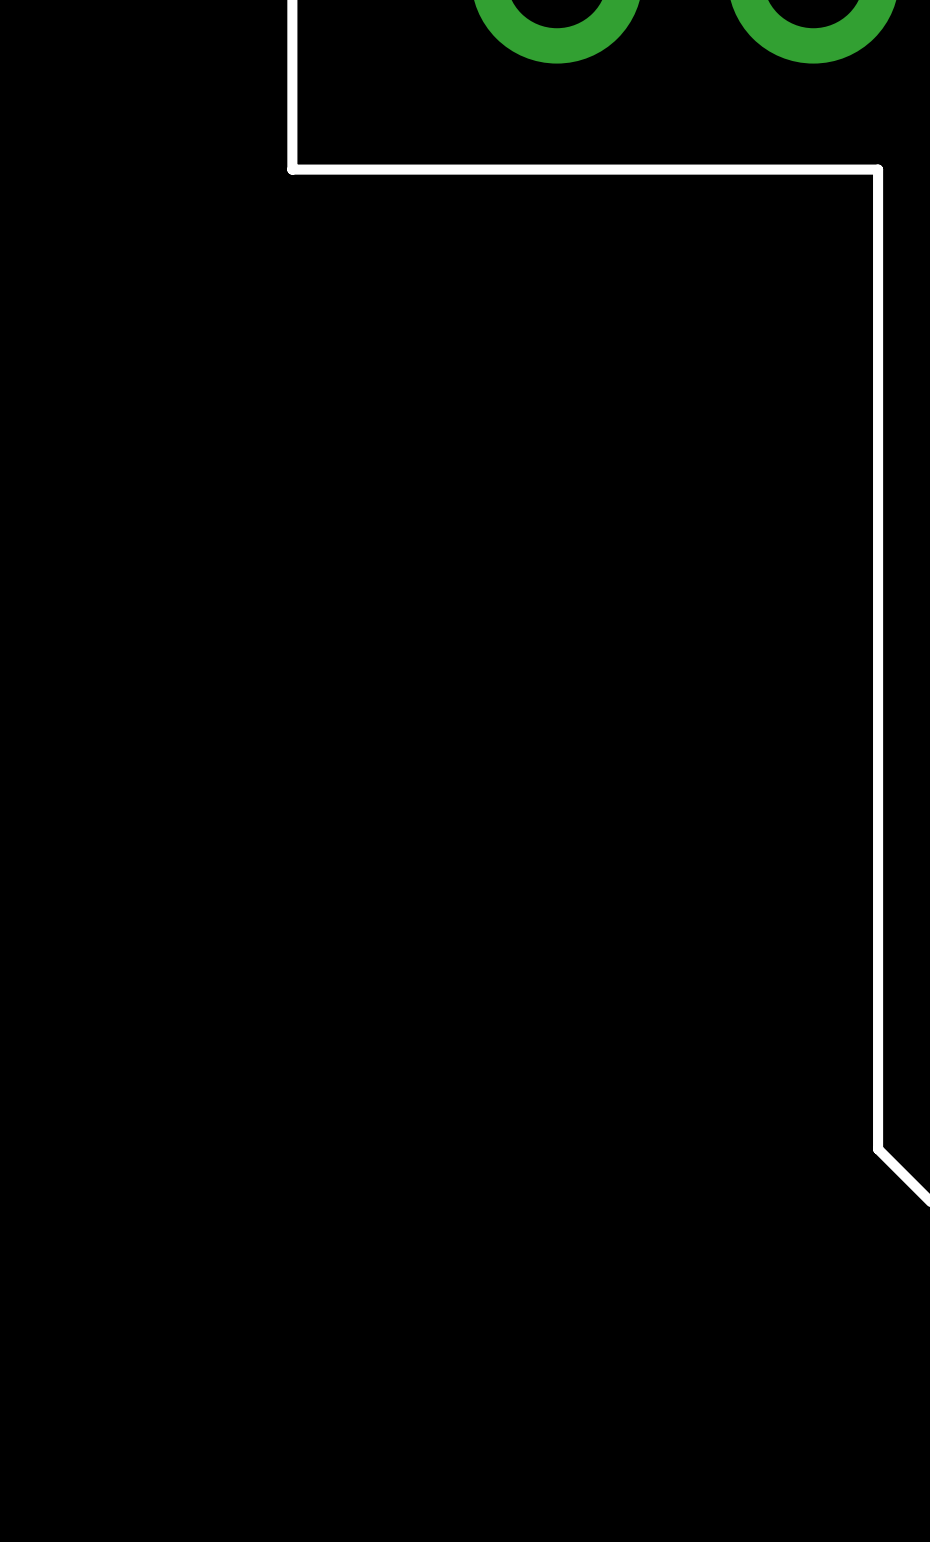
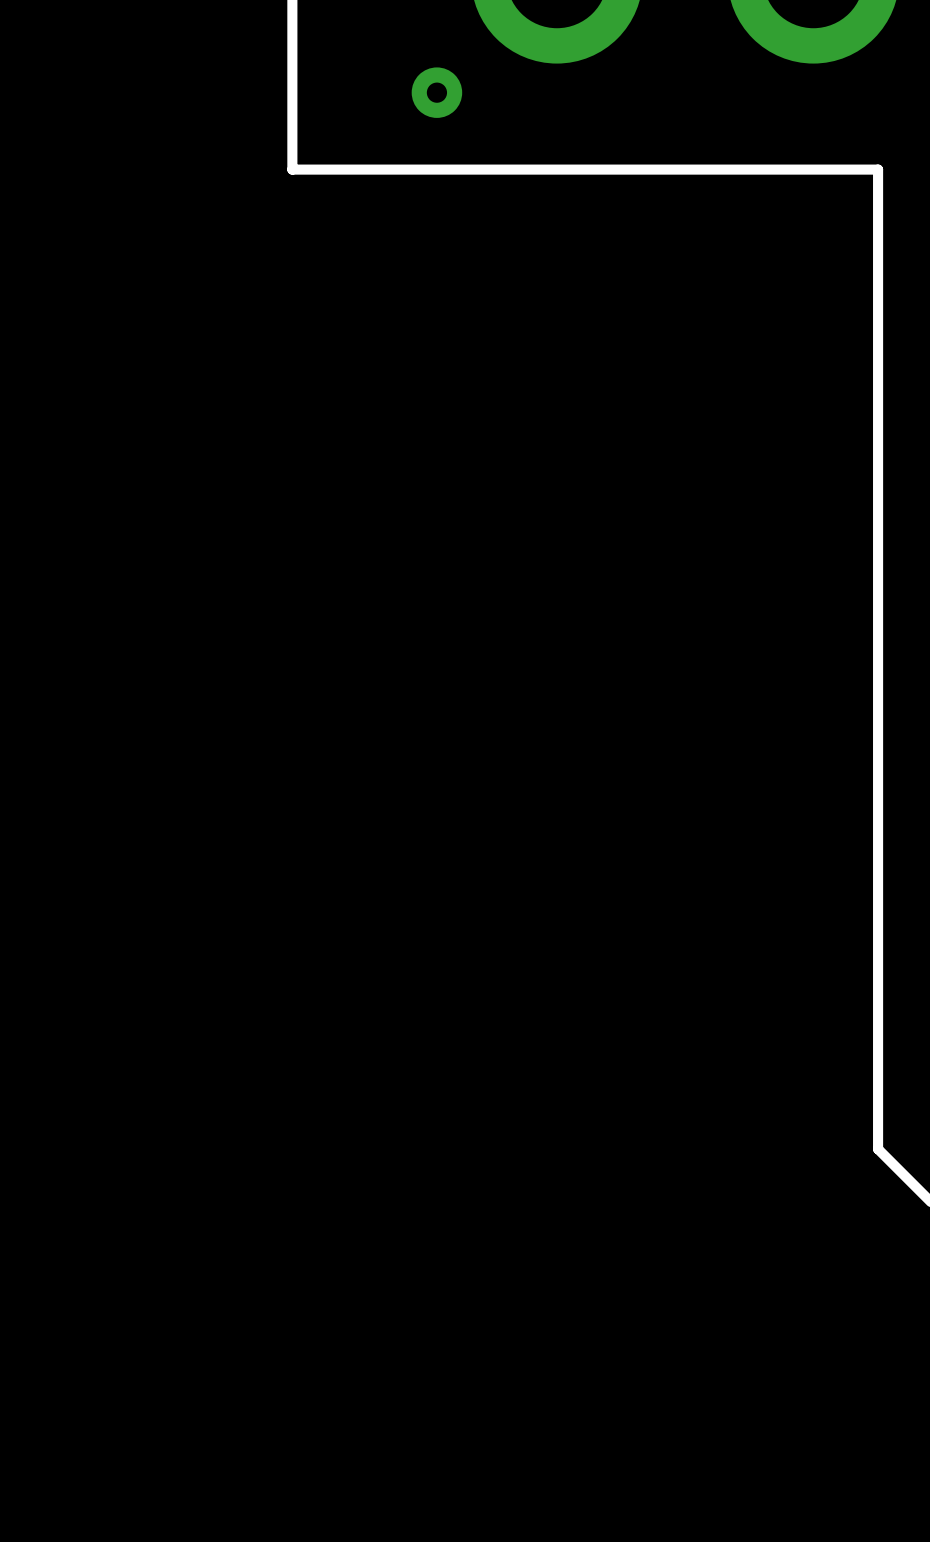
via: none -> (436, 92)

